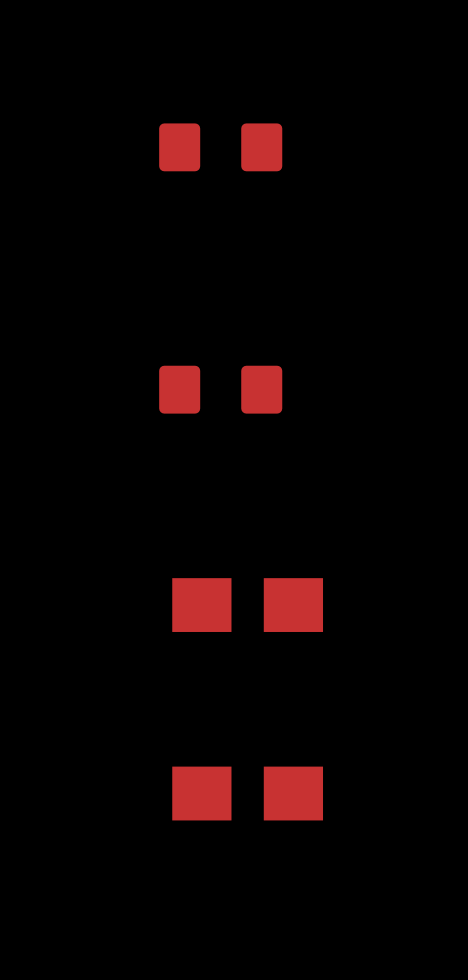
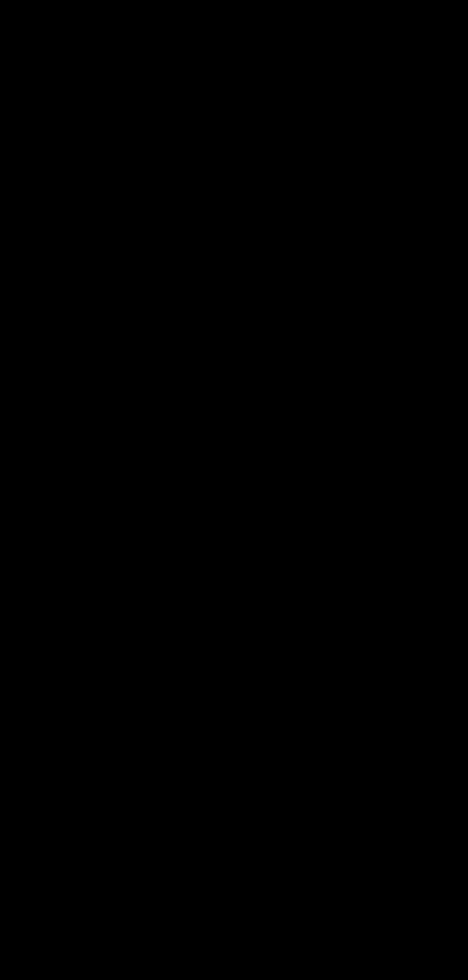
part: (220, 147) -> none
part: (220, 389) -> none
part: (247, 605) -> none
part: (247, 793) -> none

